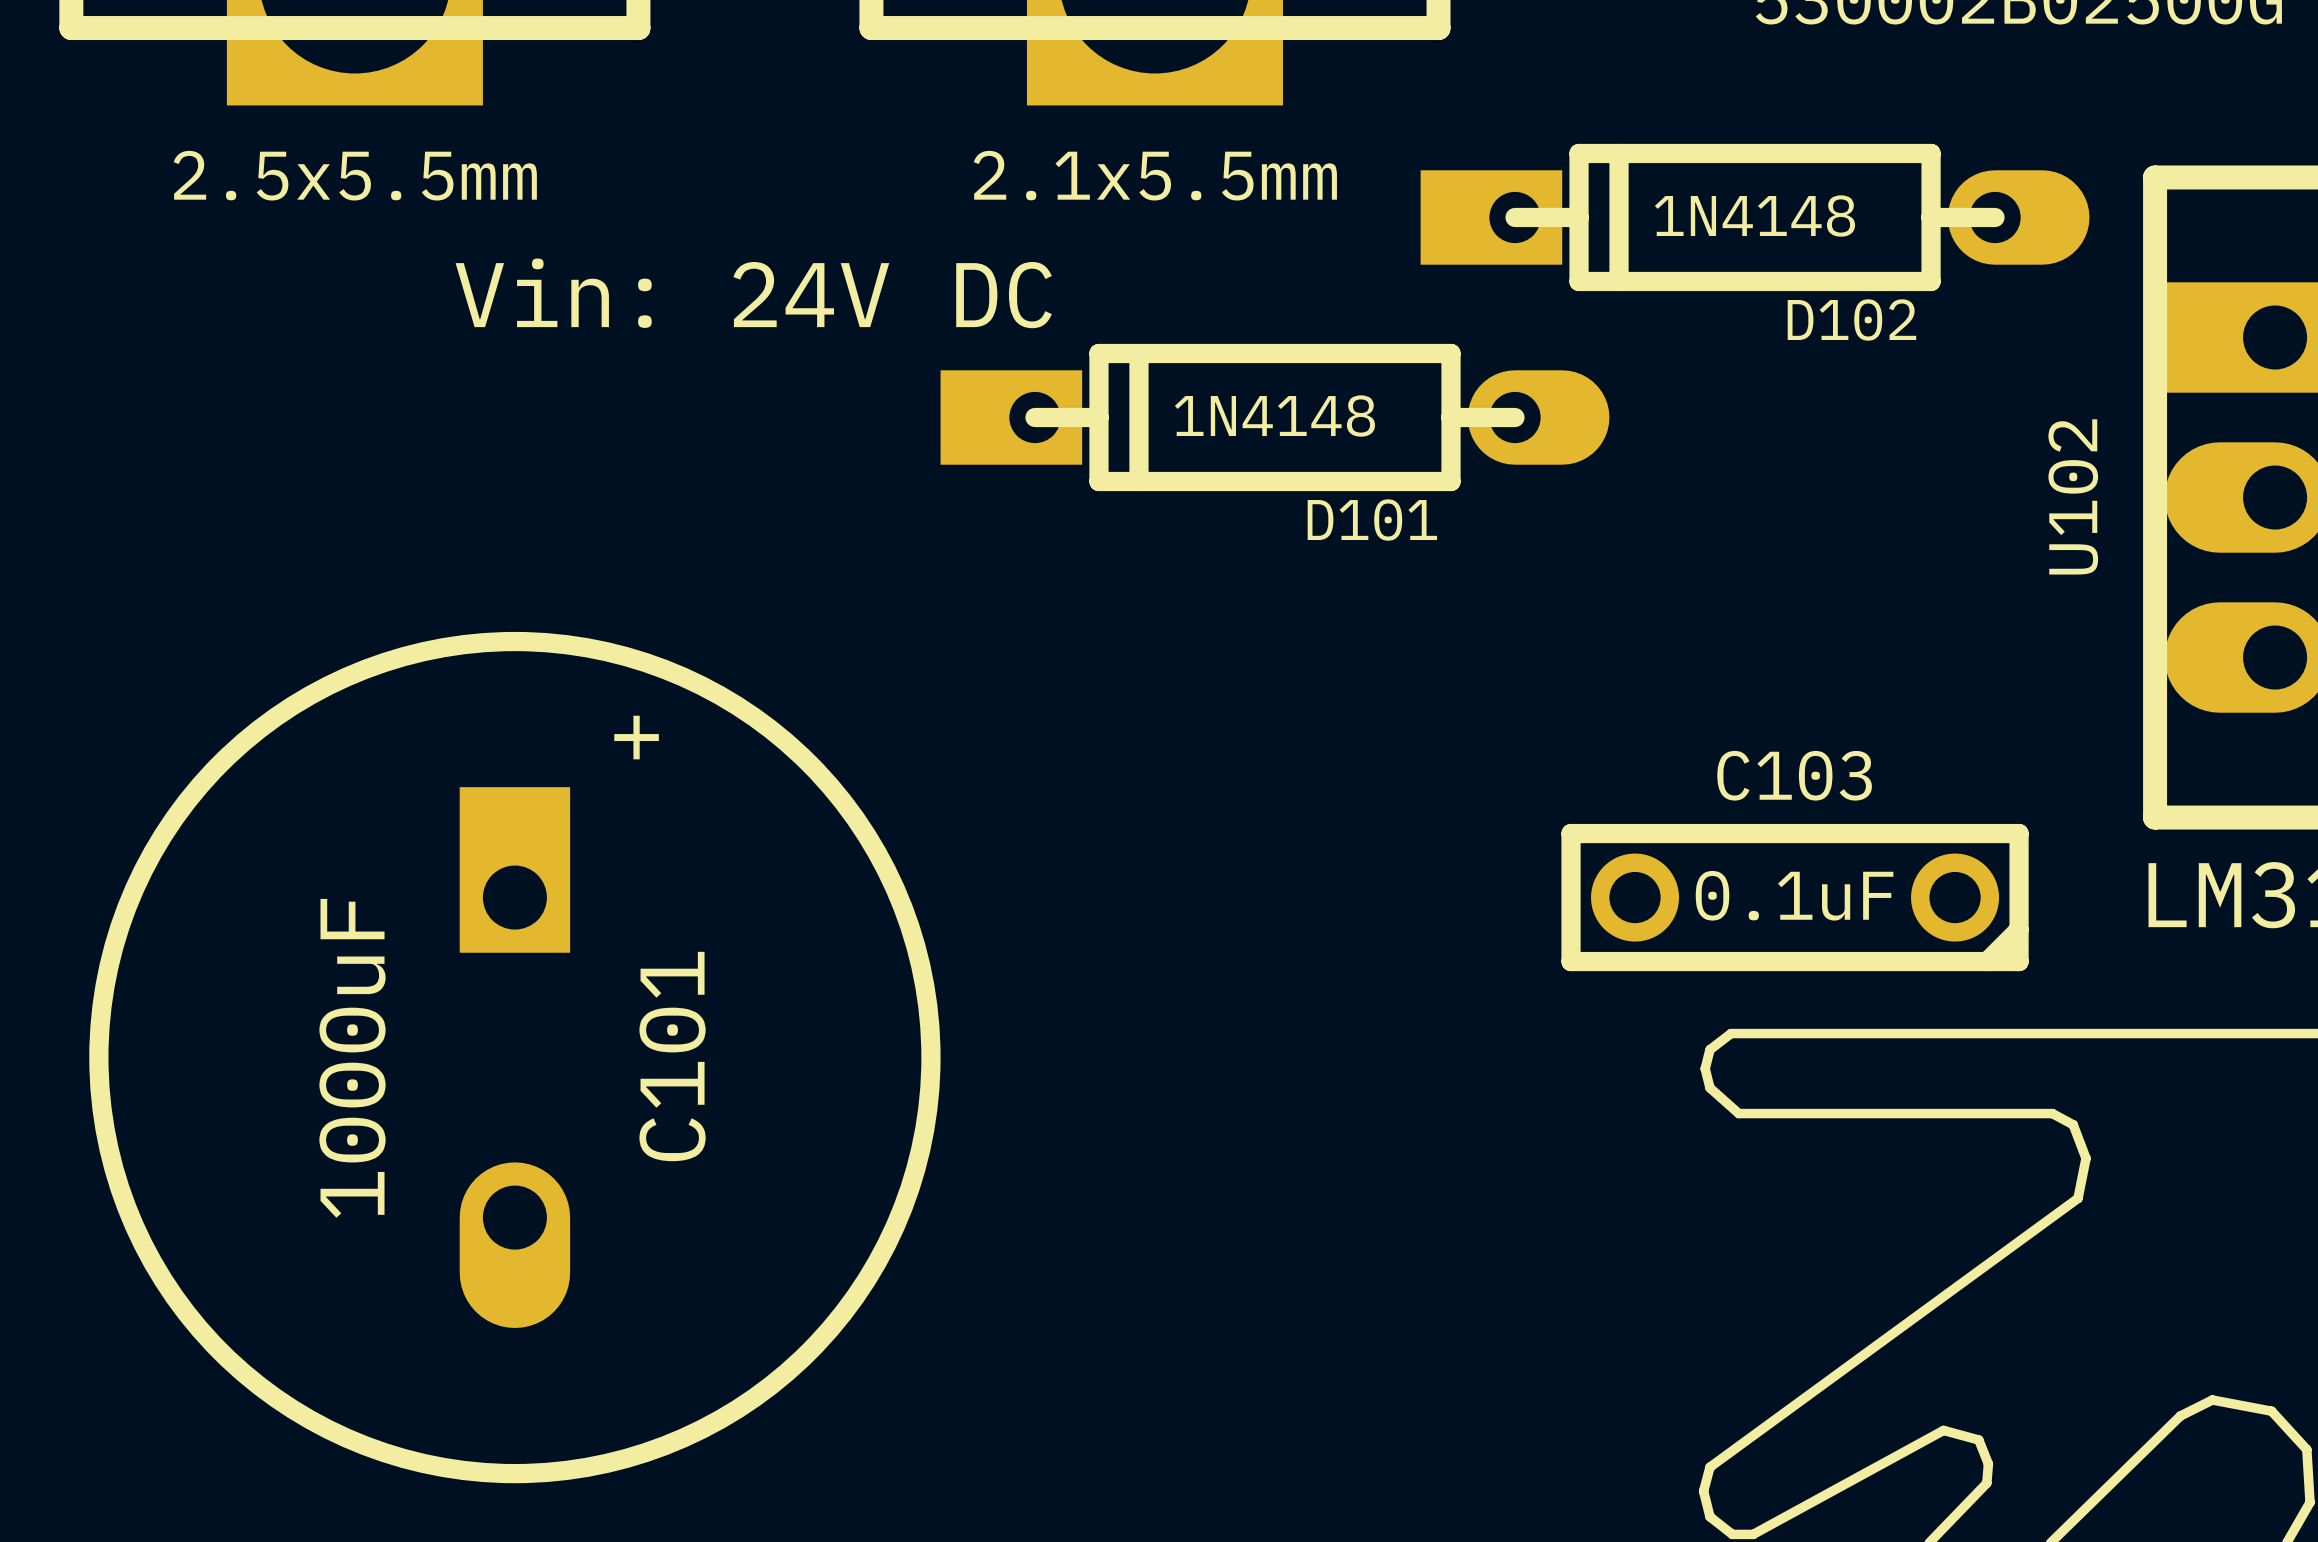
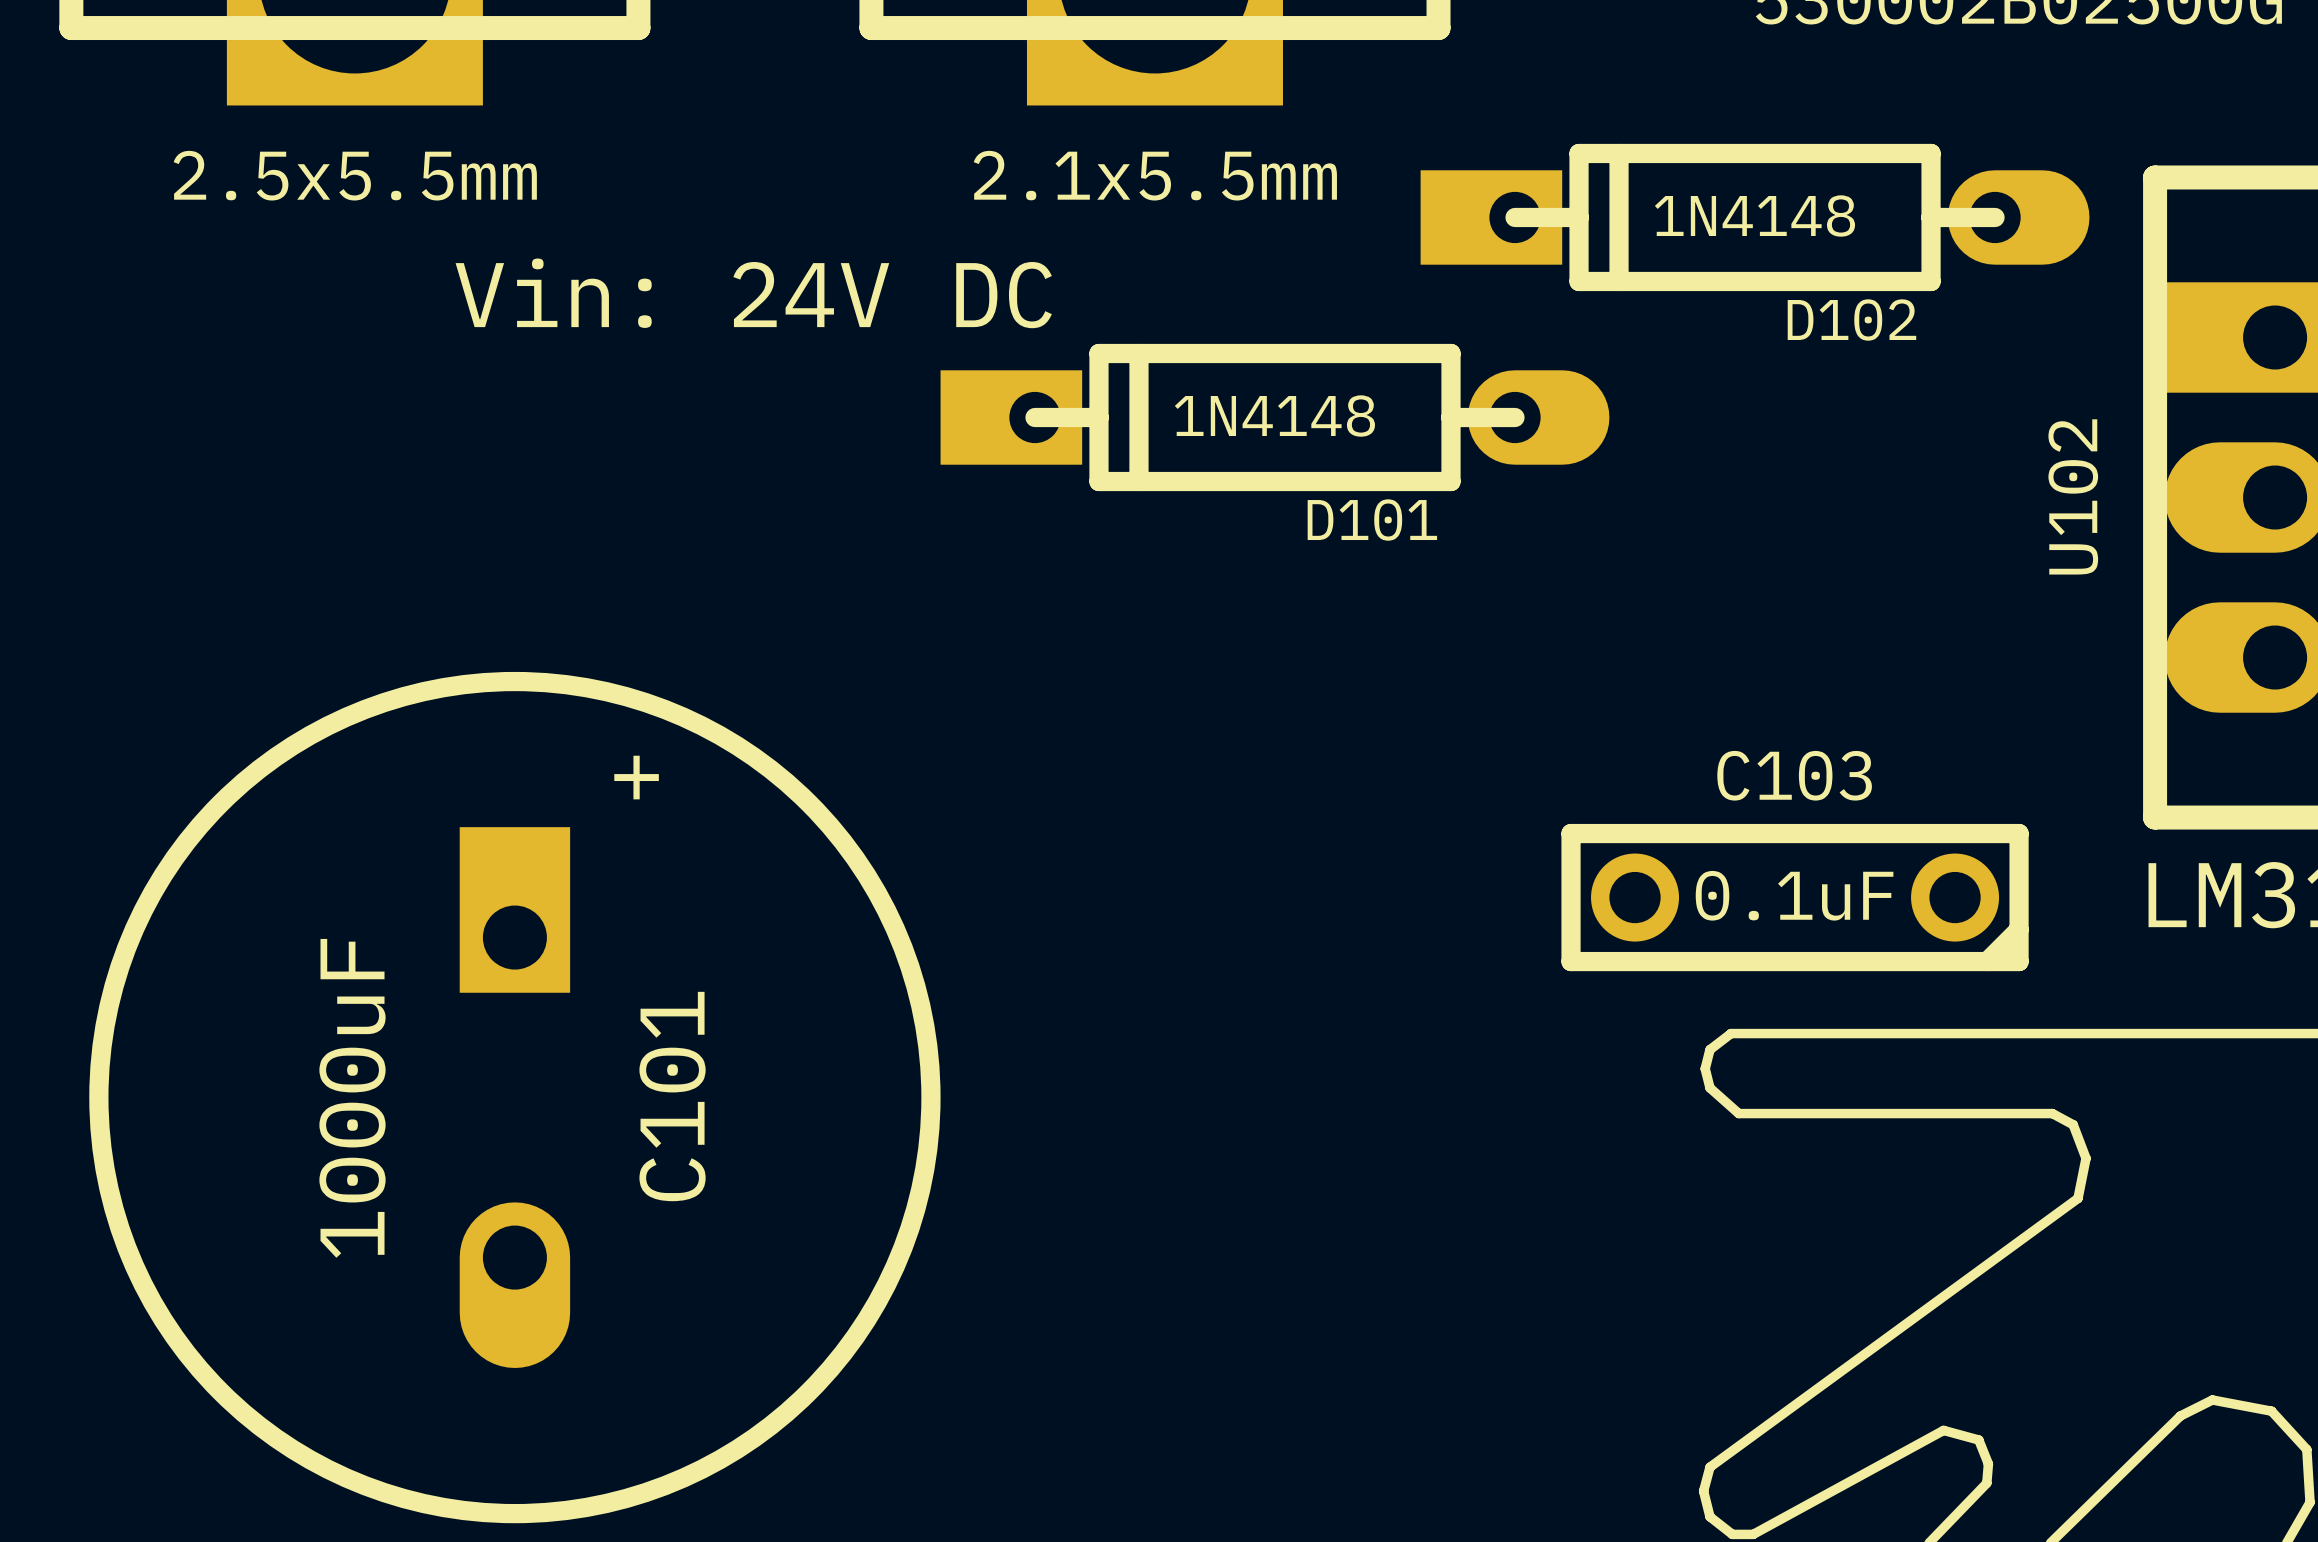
C101 position: (514, 1057) -> (514, 1097)

